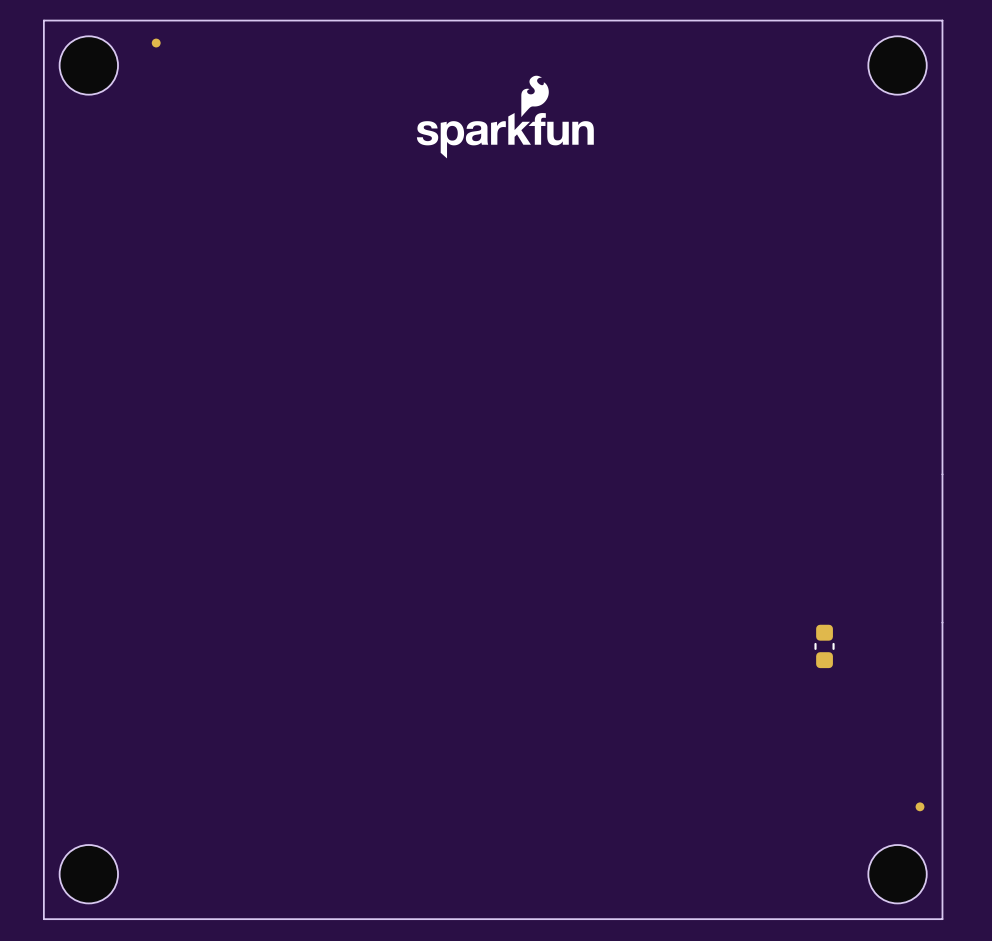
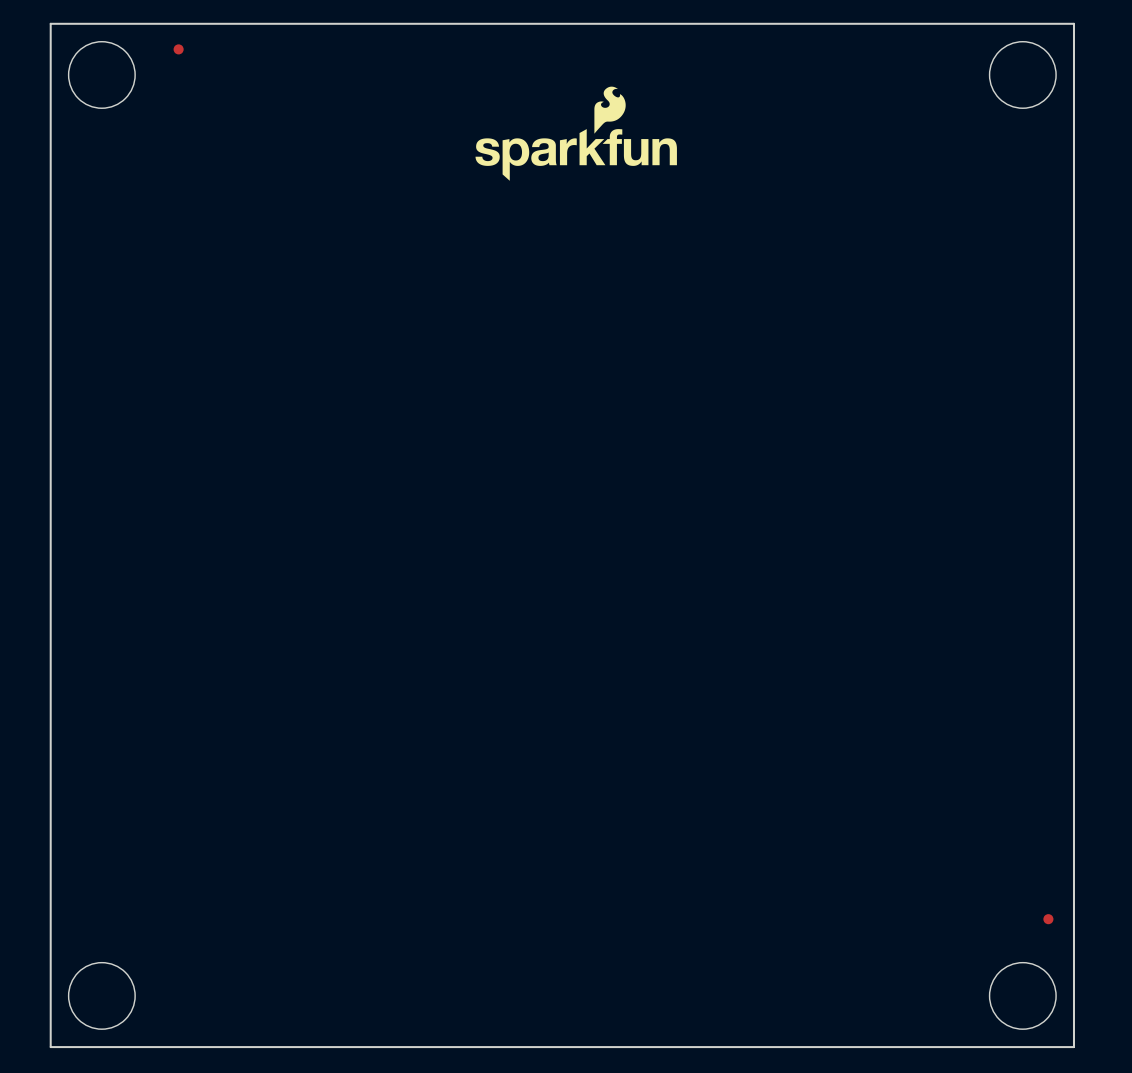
part: (824, 646) -> none

